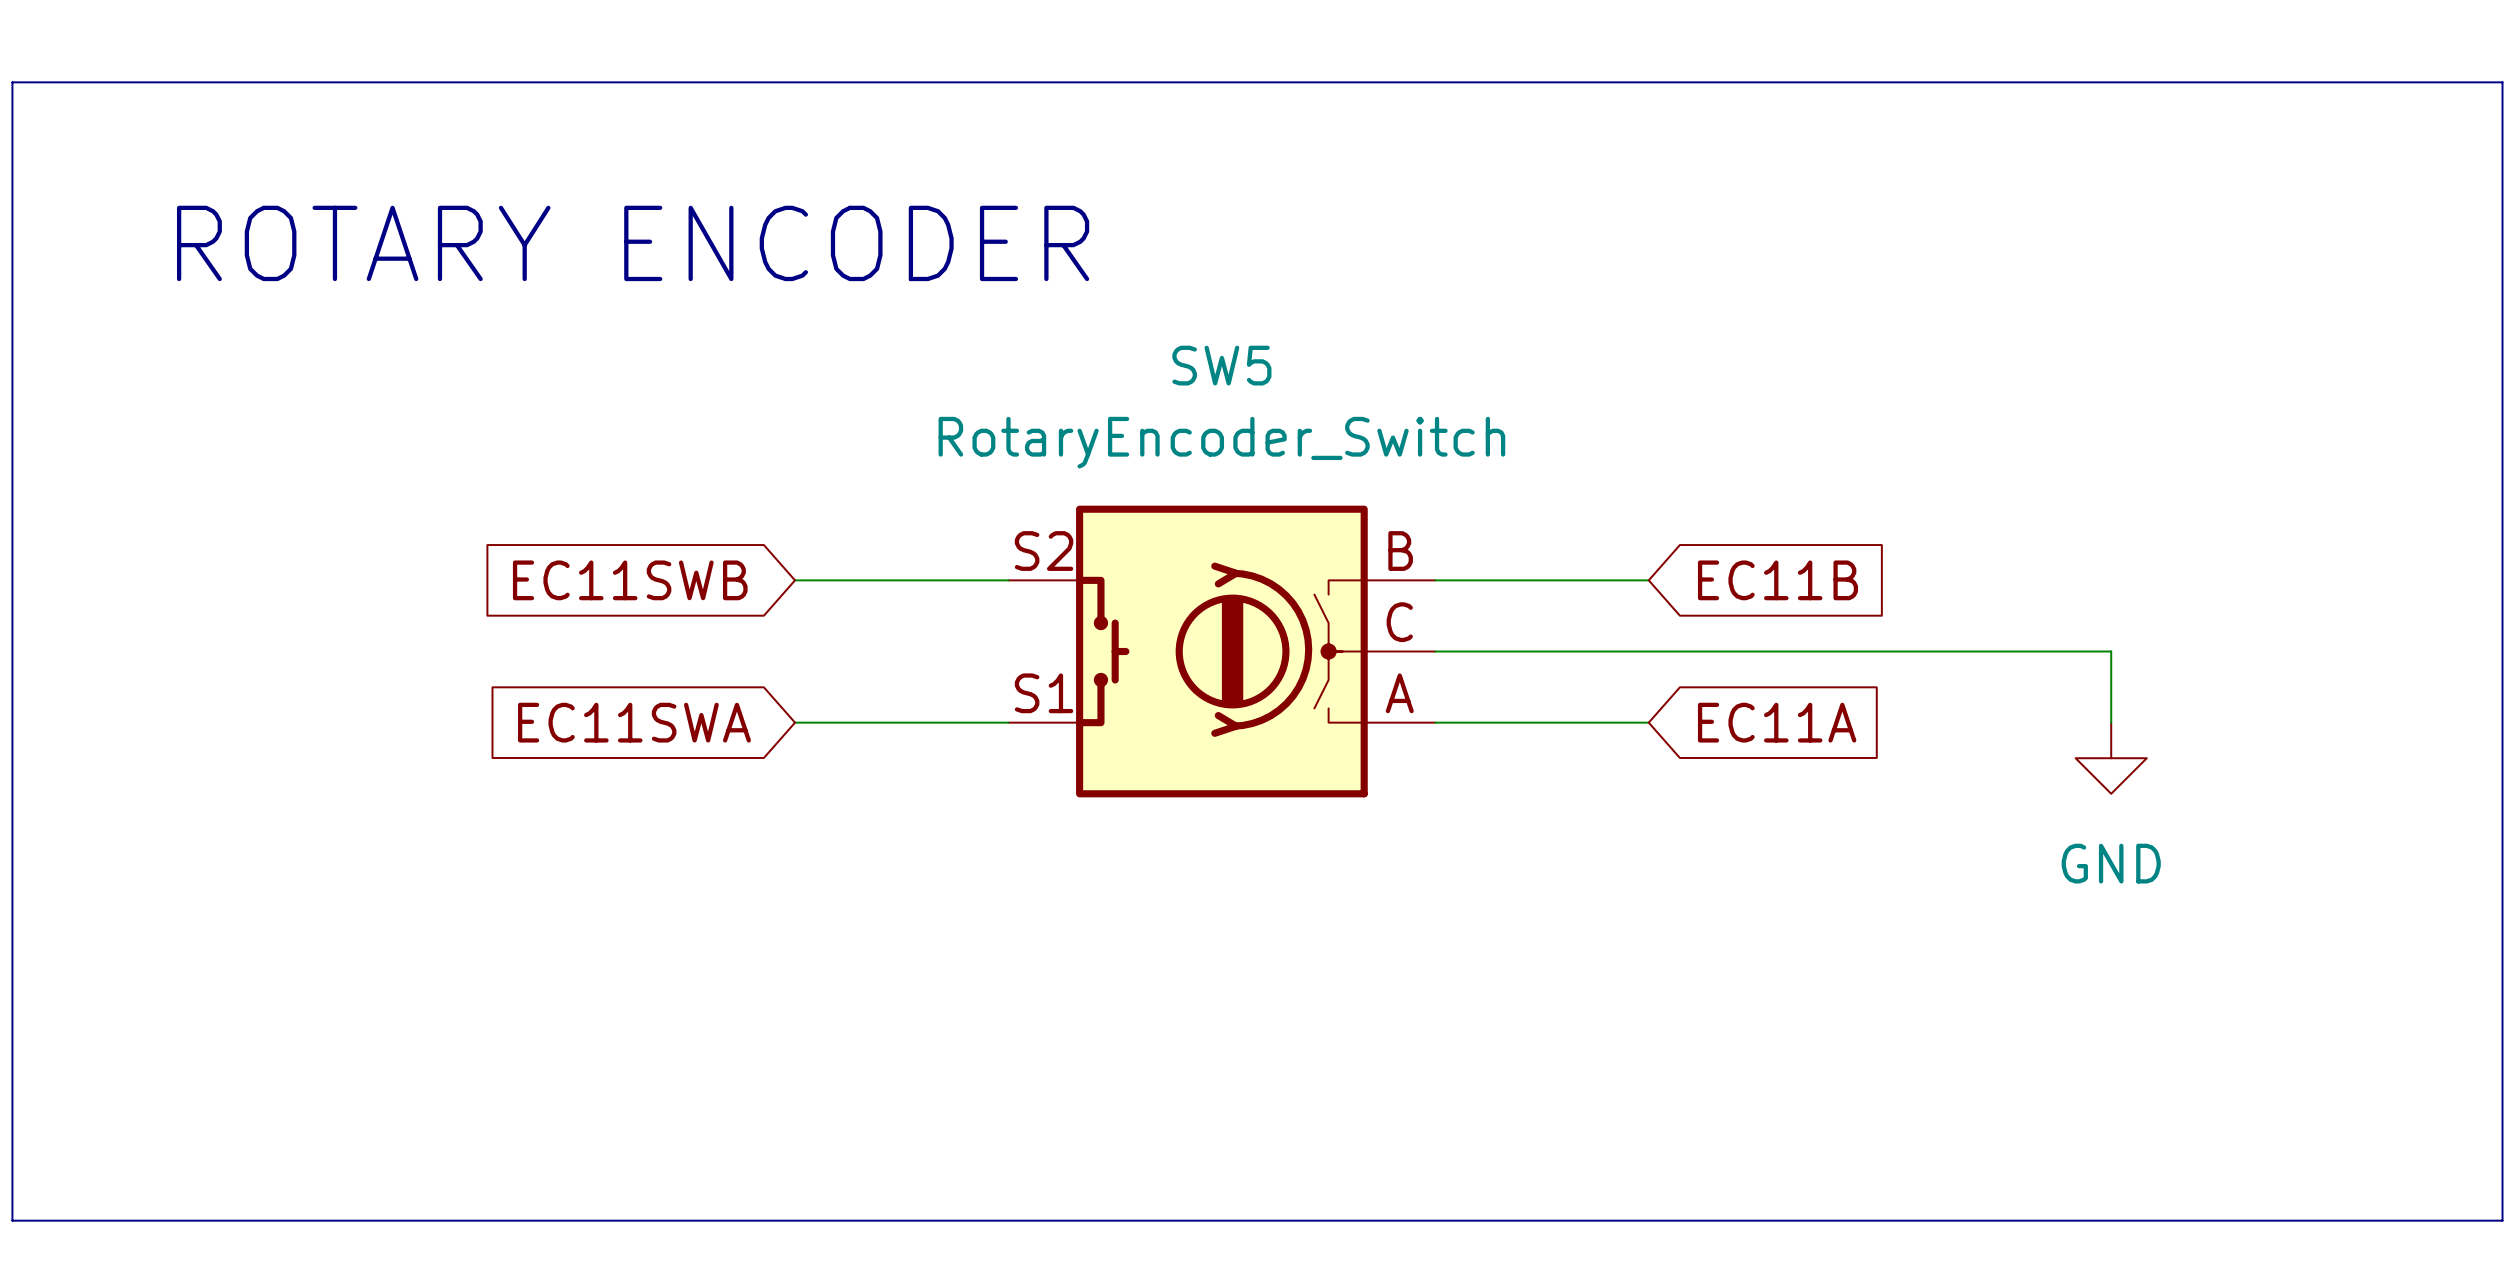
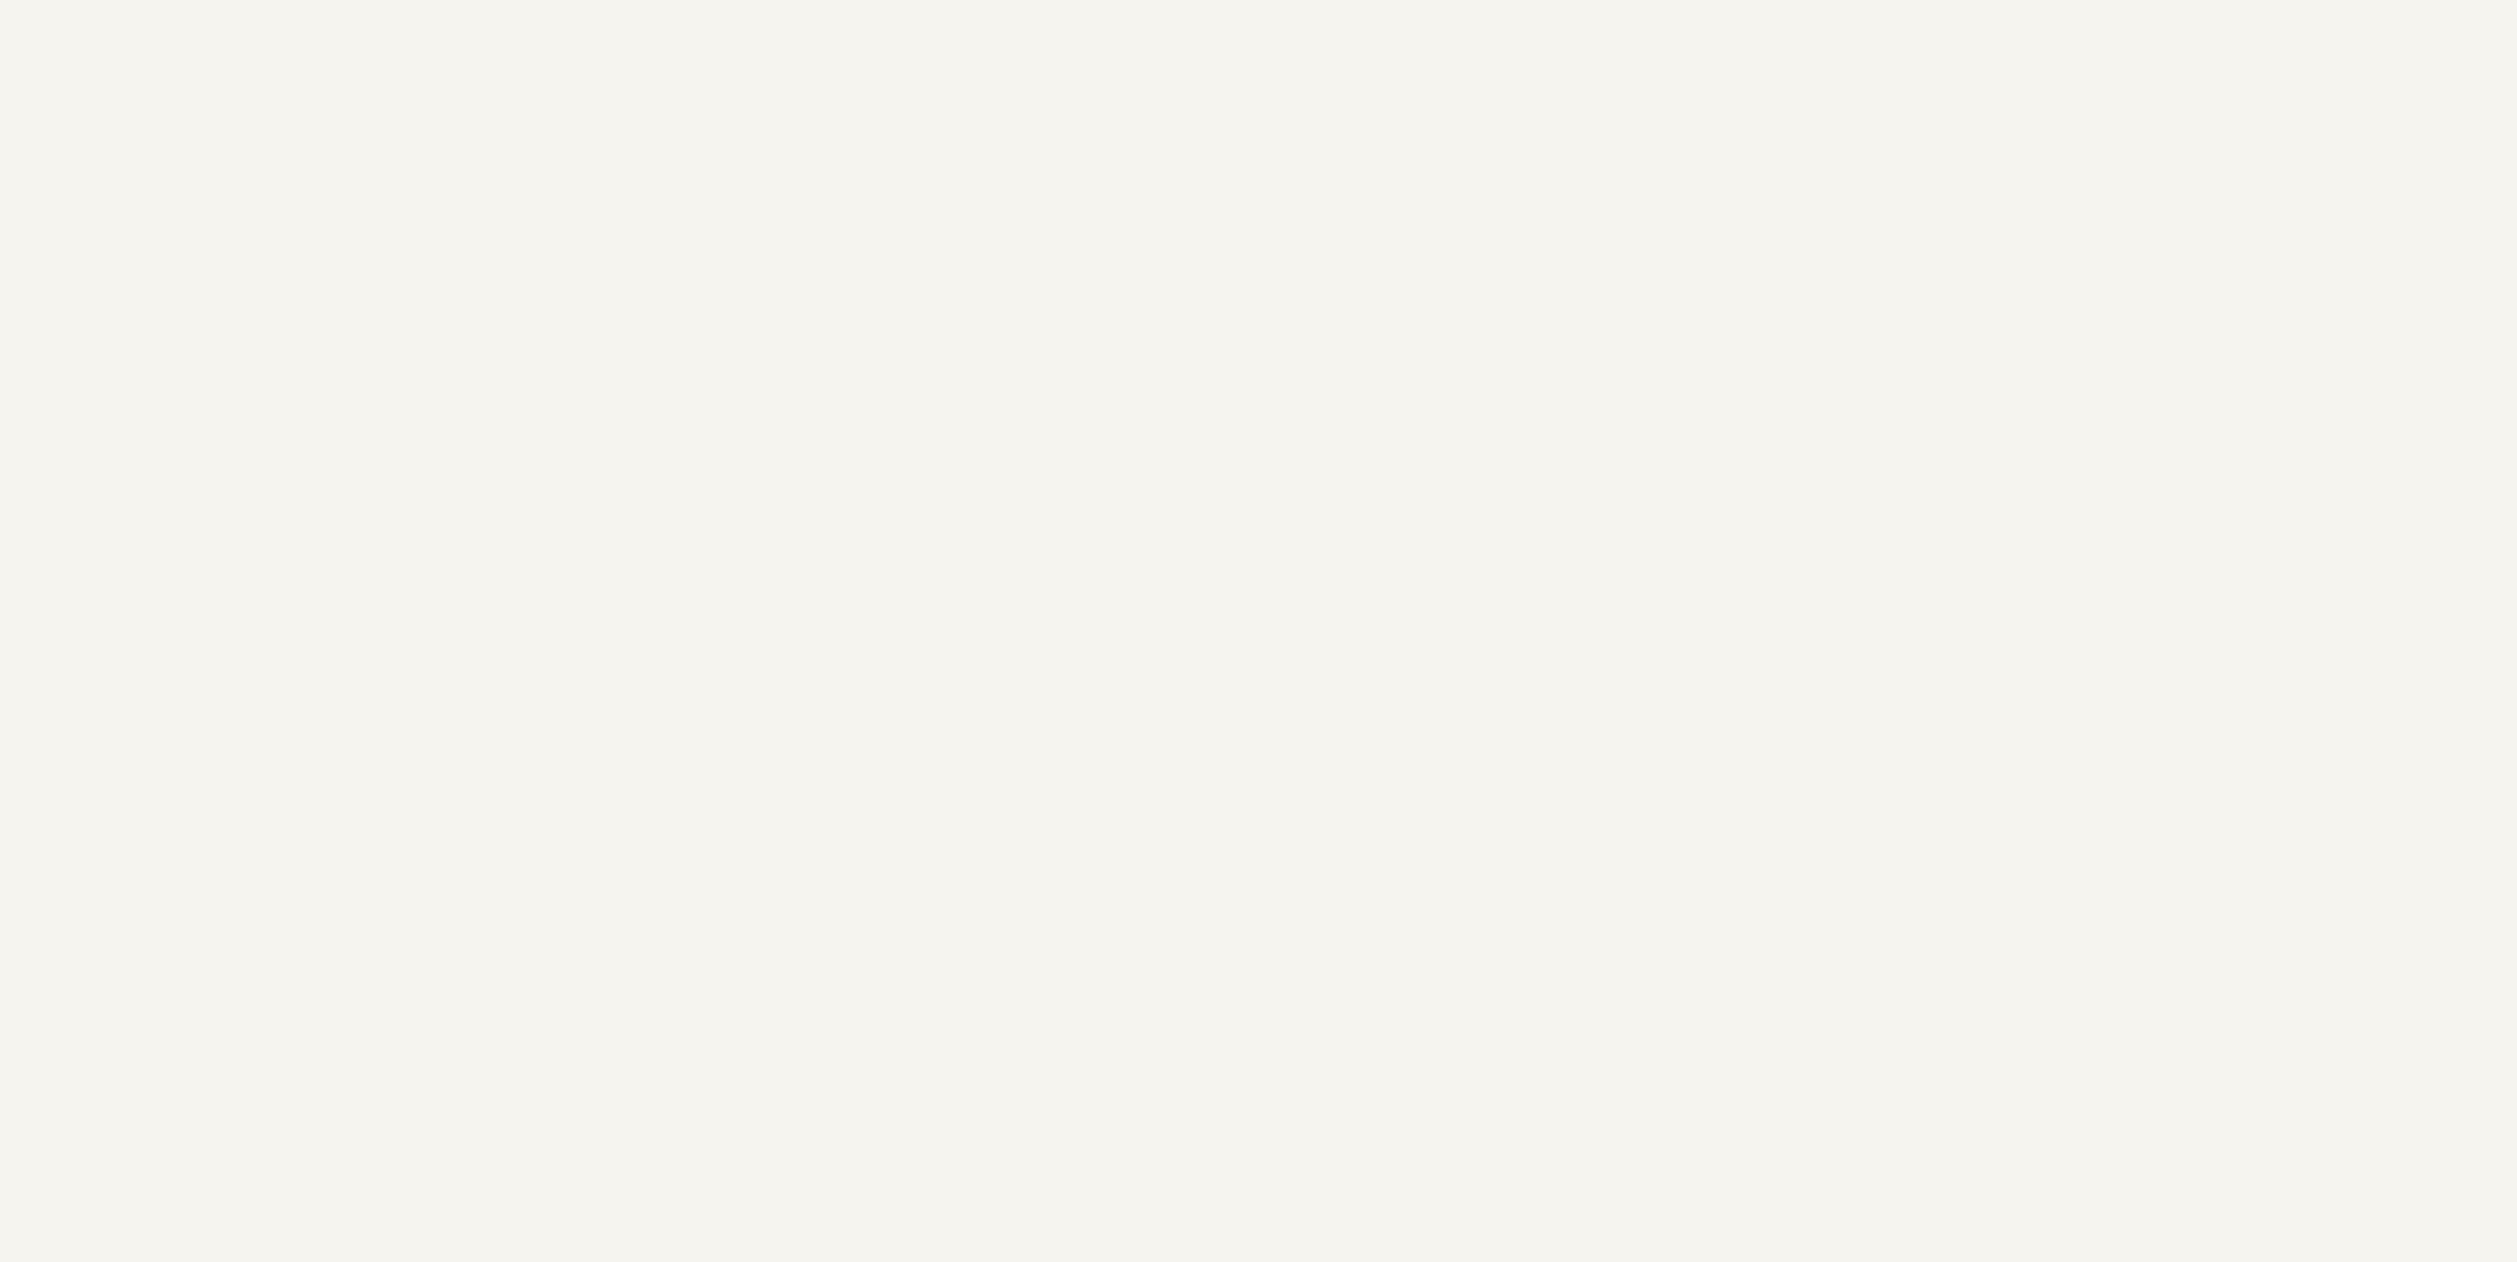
line: (12, 82) (2502, 82) (2502, 1220) (12, 1220) (12, 82) -> none
text: ROTARY ENCODER (633, 243) -> none
global label: EC11SWB (630, 580) -> none
wire: (795, 580) (1008, 580) -> none
wire: (1435, 580) (1648, 580) -> none
global label: EC11B (1777, 580) -> none
SW5: RotaryEncoder_Switch (1221, 651) -> none
wire: (1435, 651) (2111, 651) (2111, 722) -> none
global label: EC11SWA (634, 722) -> none
wire: (795, 722) (1008, 722) -> none
wire: (1435, 722) (1648, 722) -> none
global label: EC11A (1777, 722) -> none
power symbol: GND (2111, 758) -> none

